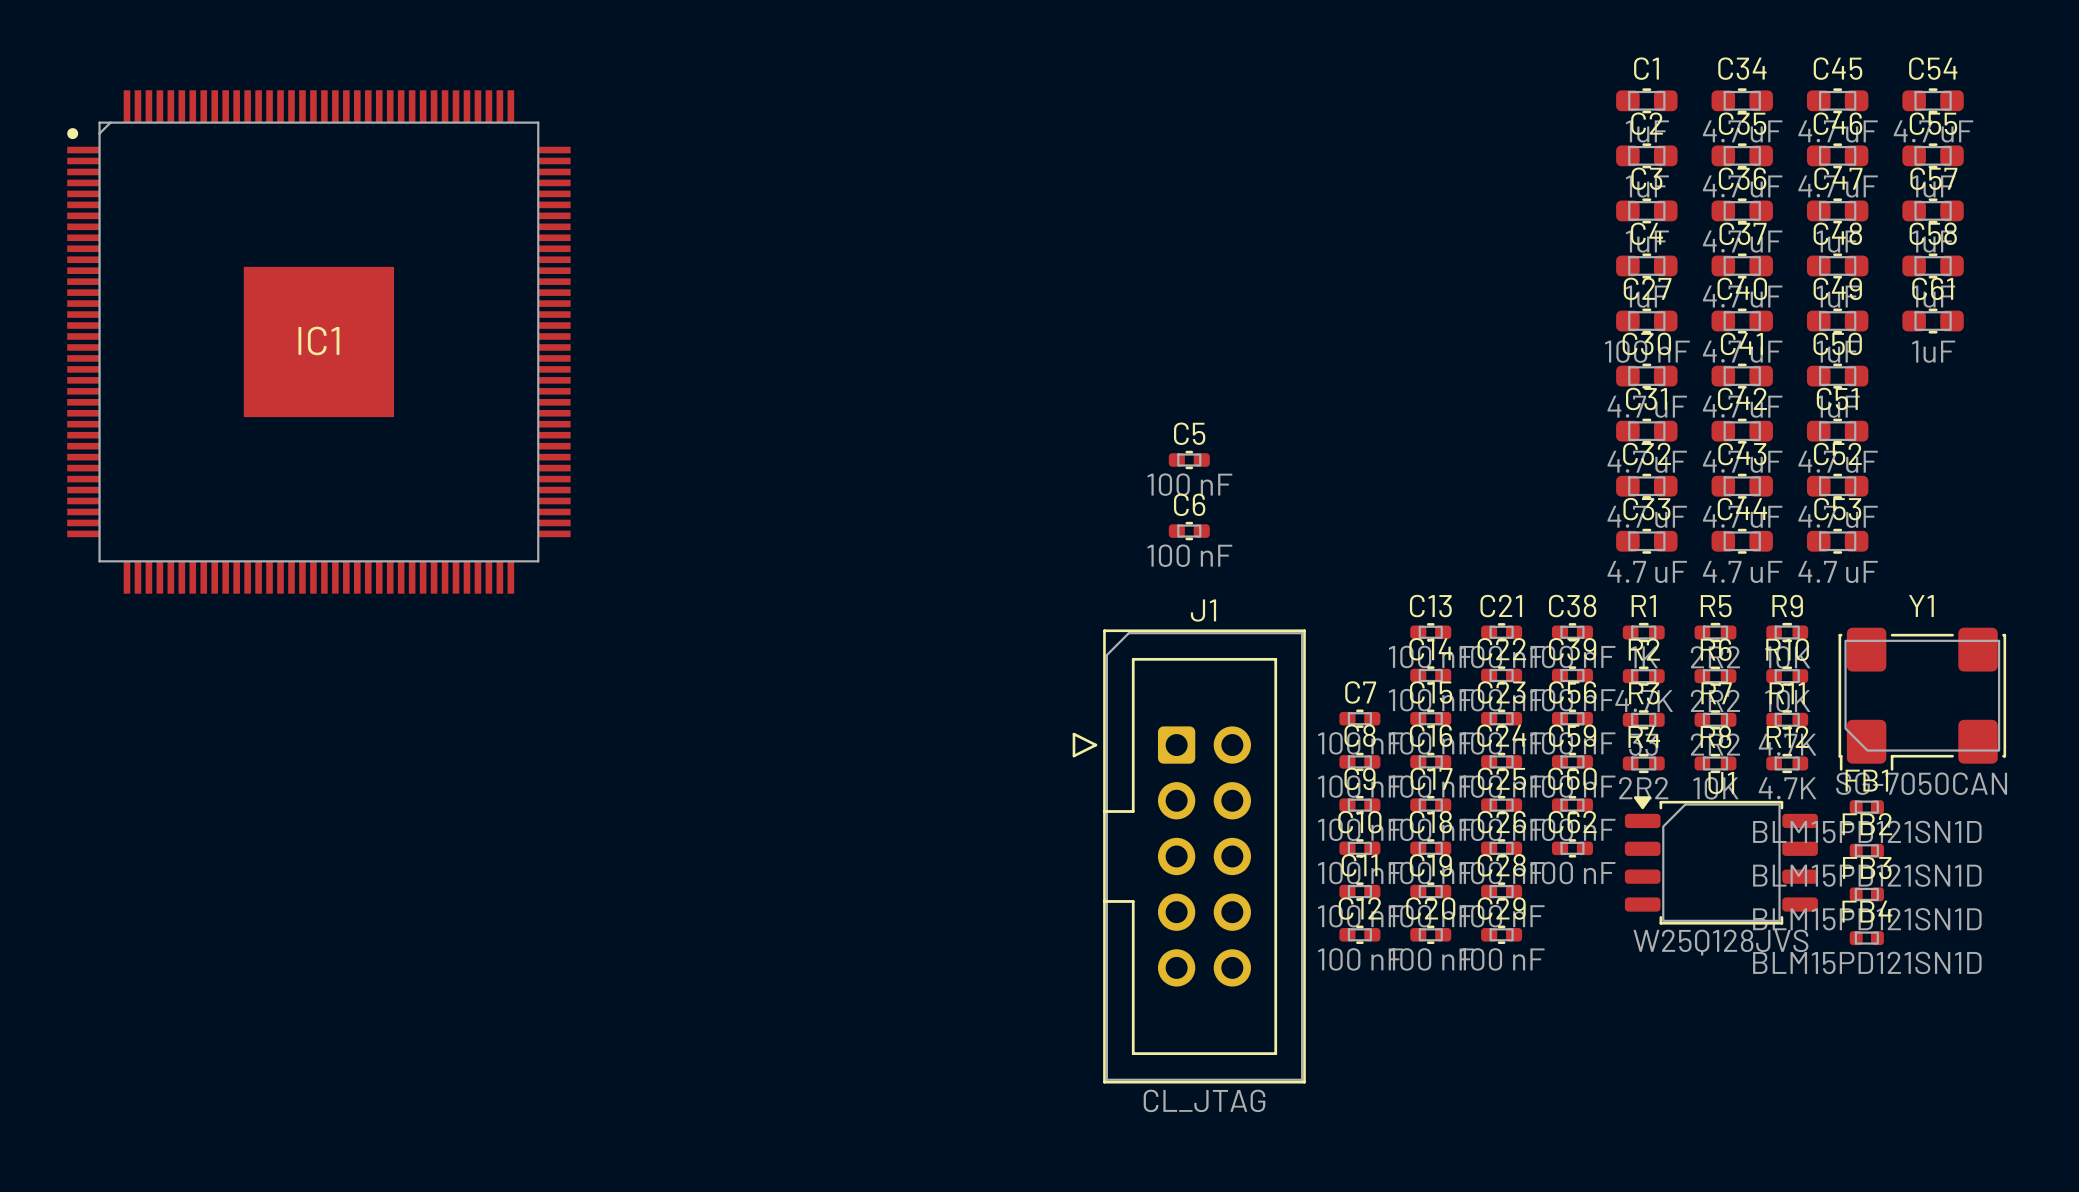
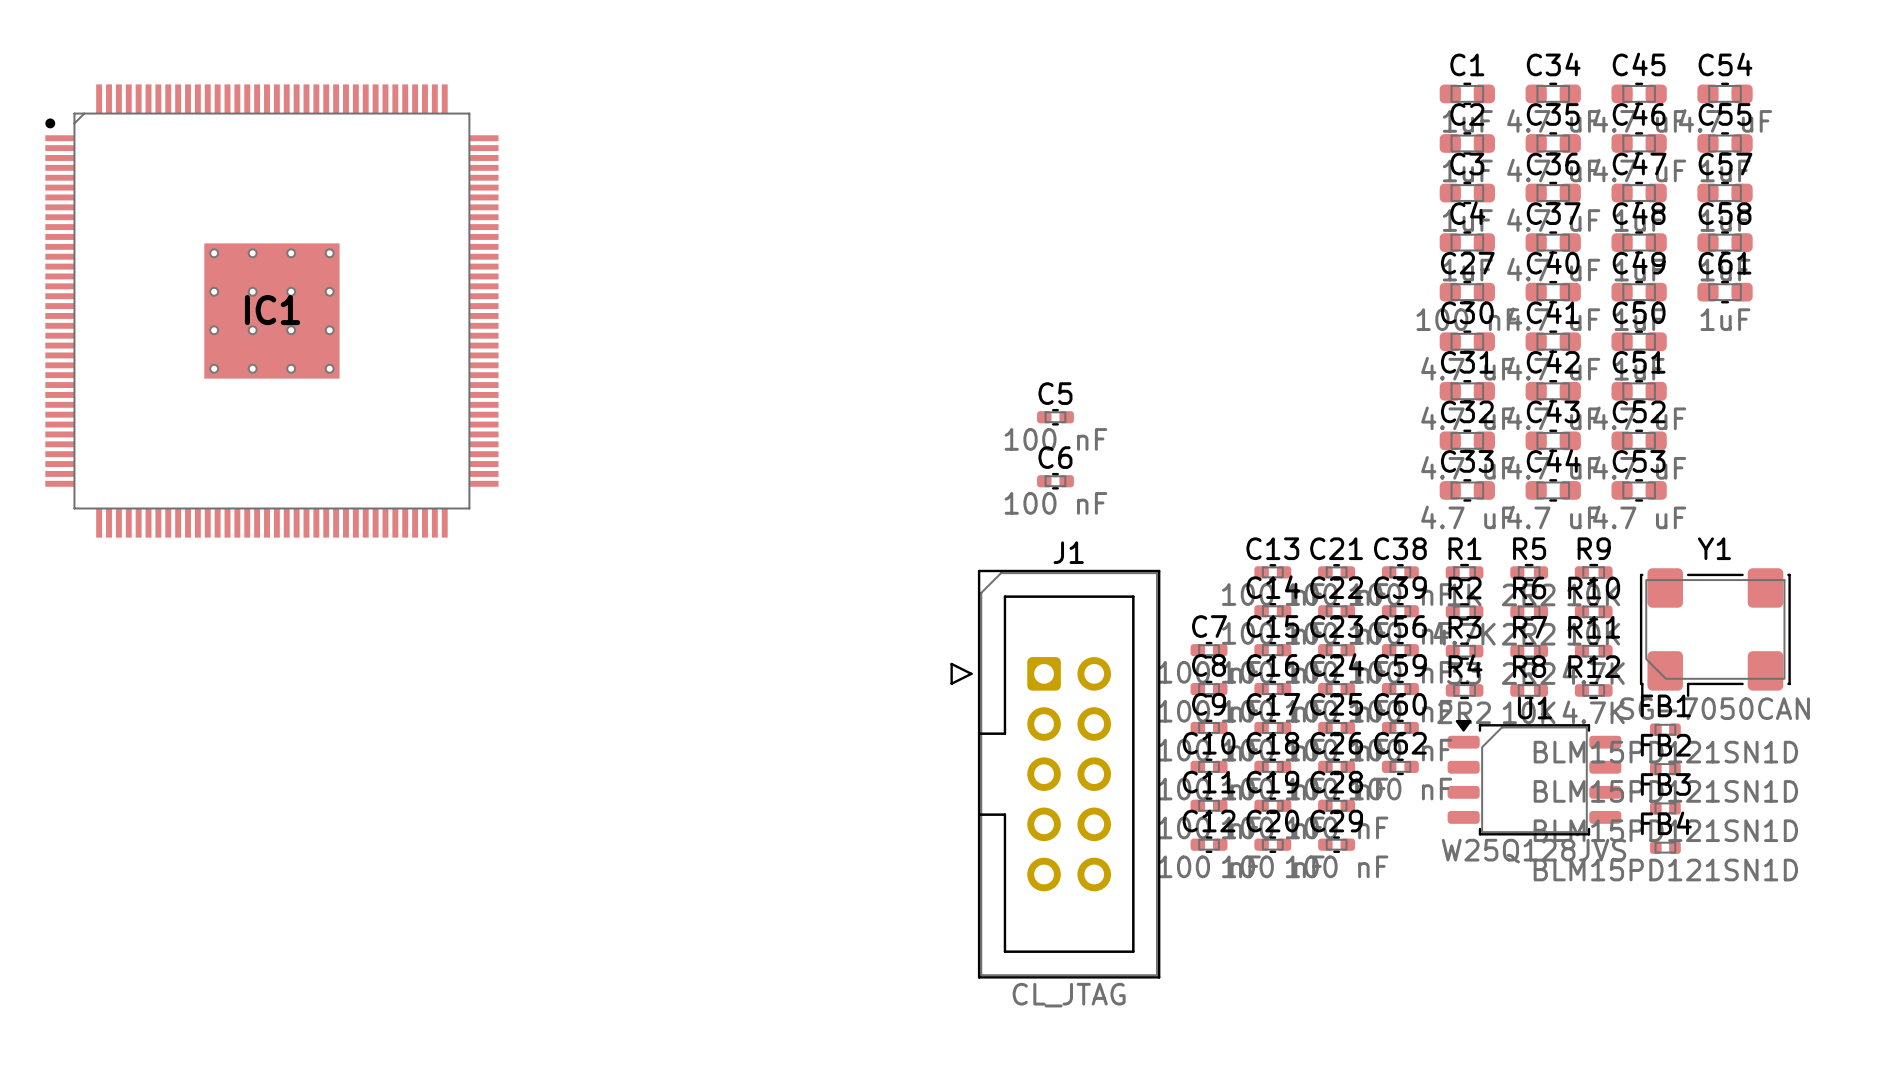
via: none -> (214, 253)
via: none -> (252, 253)
via: none -> (291, 253)
via: none -> (329, 253)
via: none -> (214, 291)
via: none -> (252, 291)
via: none -> (291, 291)
via: none -> (329, 291)
via: none -> (214, 330)
via: none -> (252, 330)
via: none -> (291, 330)
via: none -> (329, 330)
via: none -> (214, 368)
via: none -> (252, 368)
via: none -> (291, 368)
via: none -> (329, 368)

